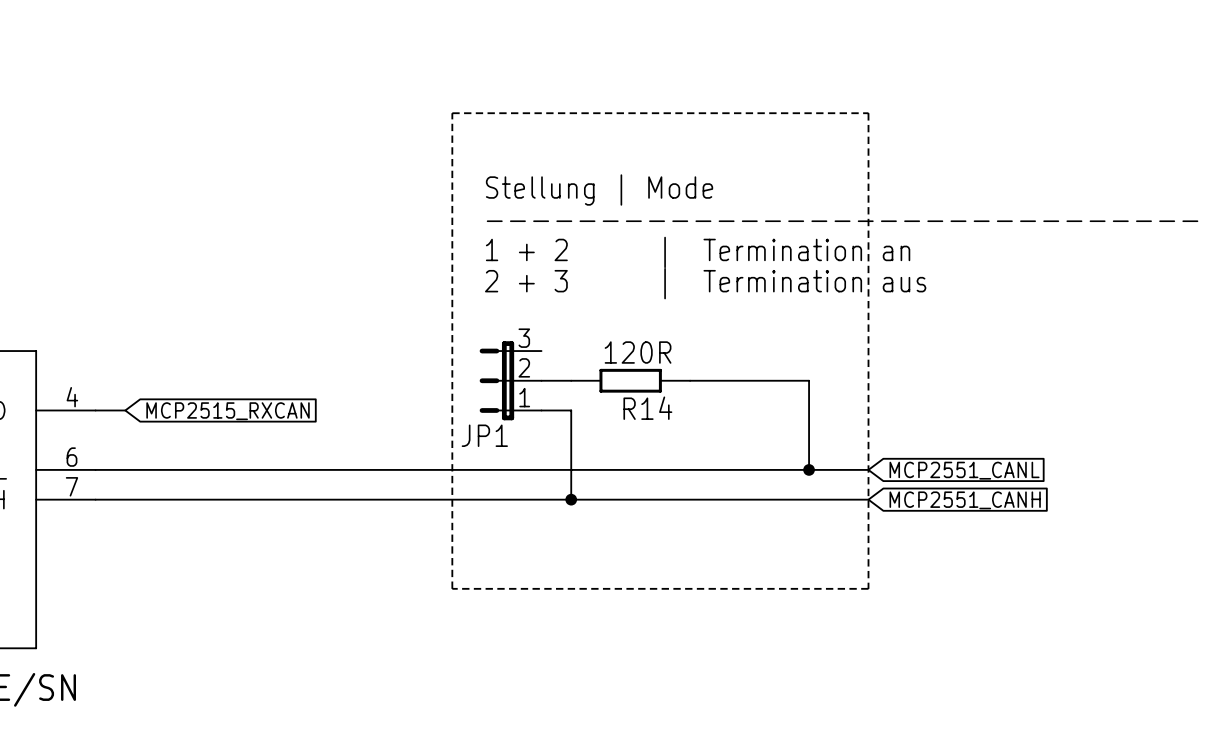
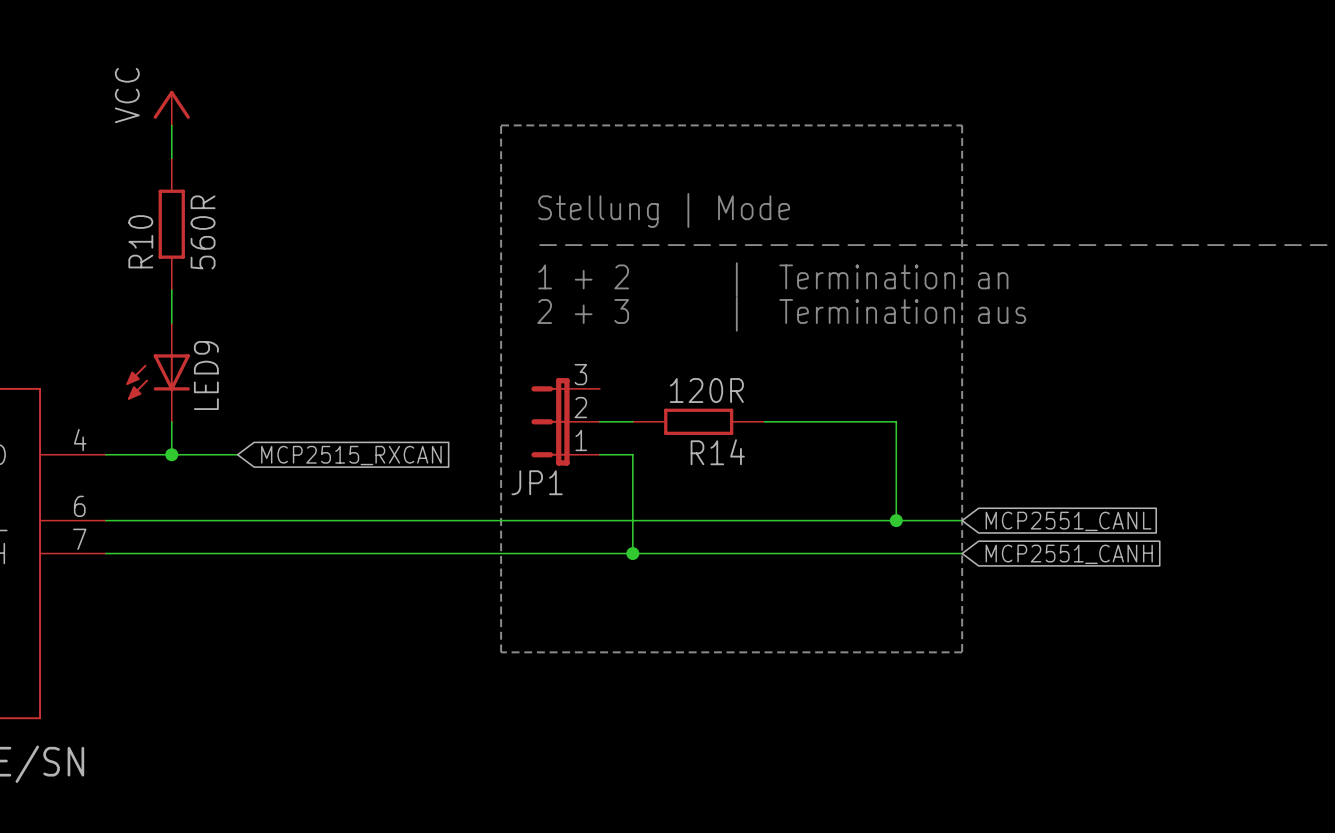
power symbol: none -> VCC (171, 108)
wire: none -> (171, 125) (171, 158)
R10: none -> 560R (171, 224)
wire: none -> (171, 290) (171, 323)
LED9: none -> (158, 372)
wire: none -> (171, 421) (171, 454)
wire: none -> (138, 454) (237, 454)
junction: none -> (171, 454)
global label position: MCP2515_RXCAN (228, 411) -> MCP2515_RXCAN (351, 455)

